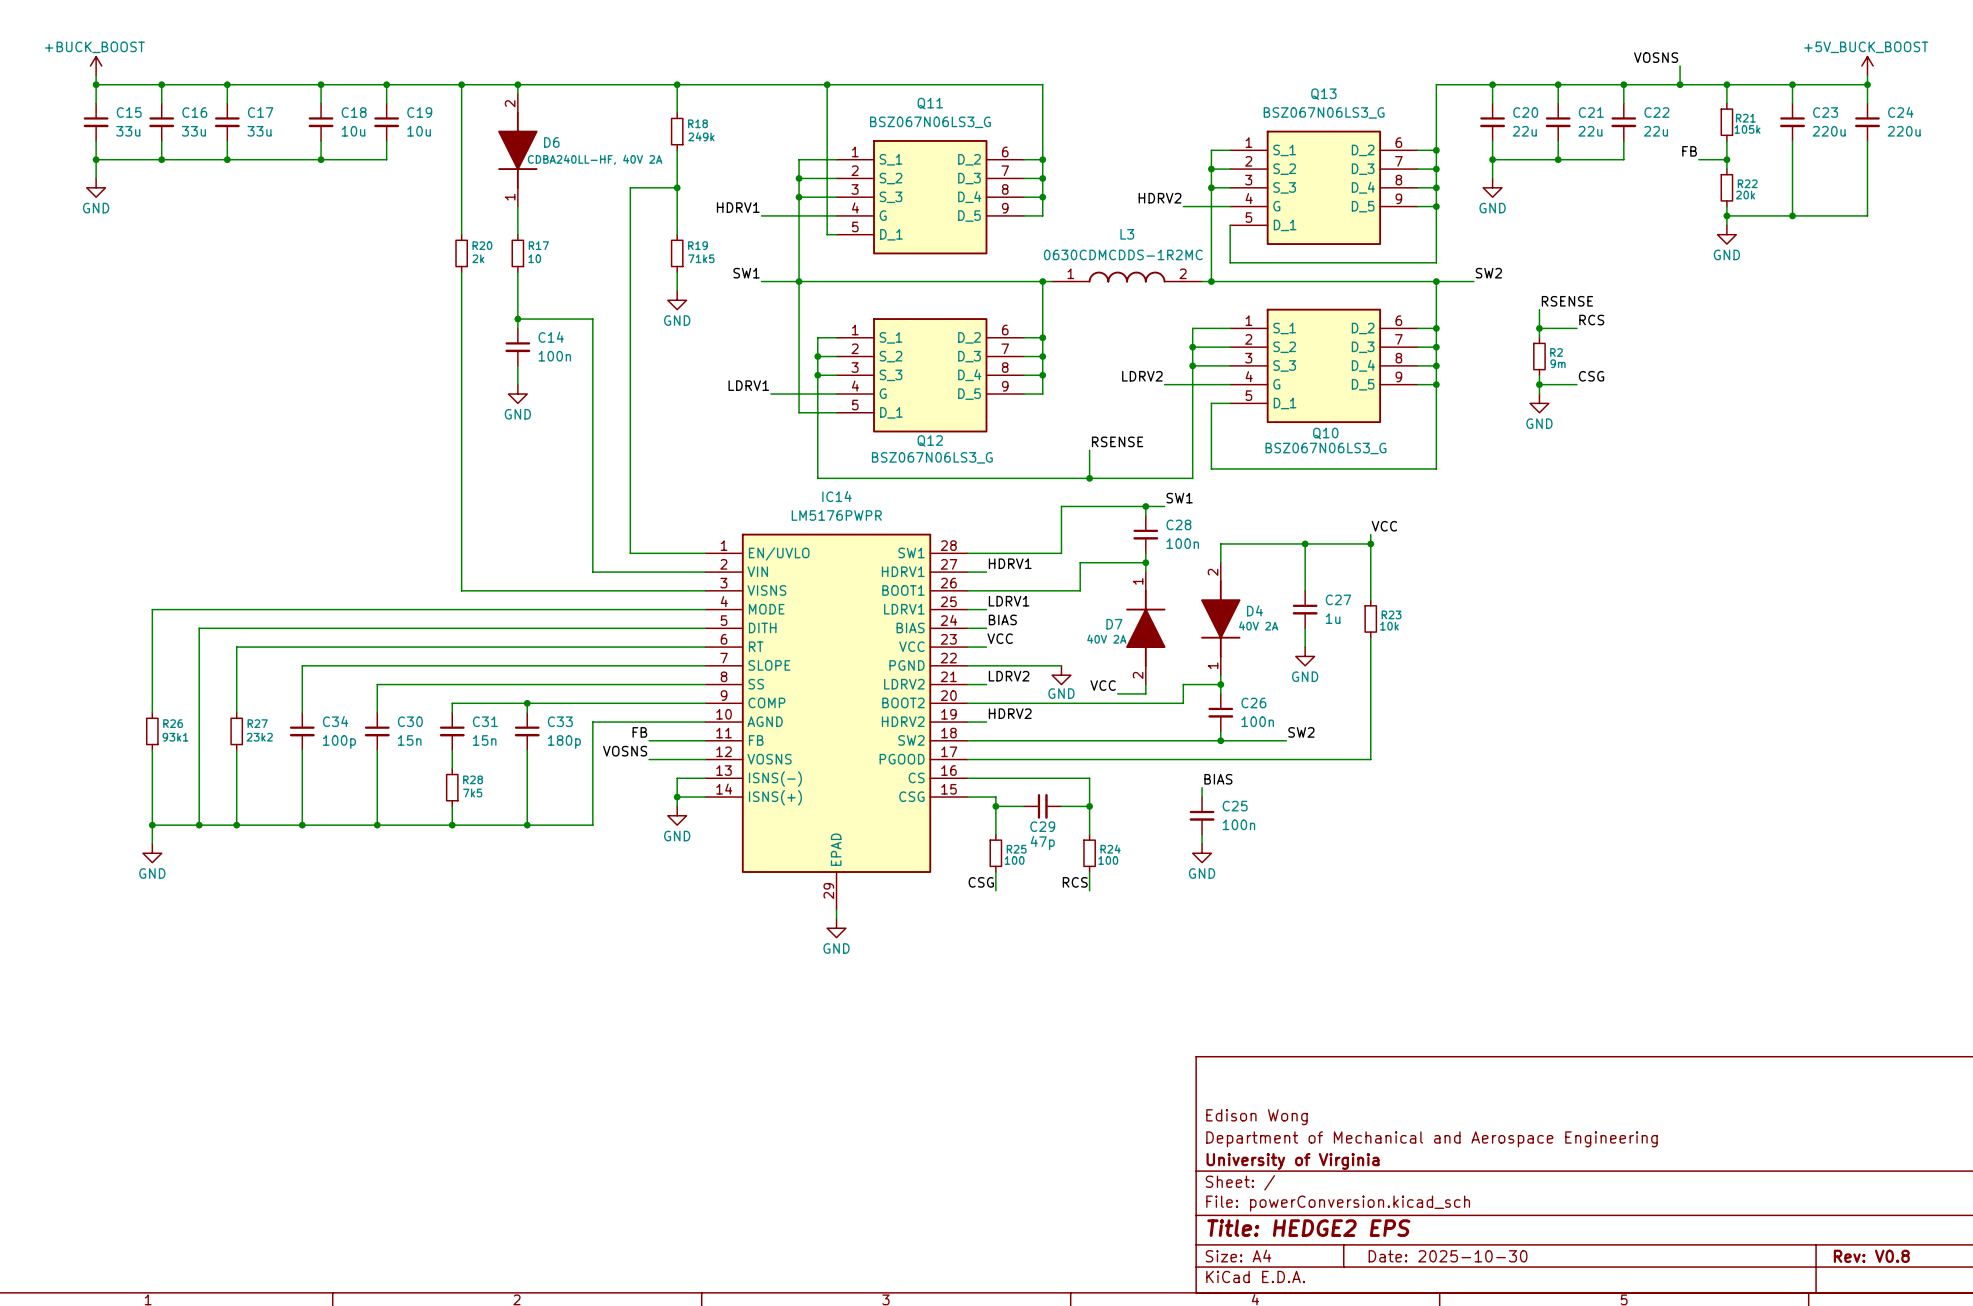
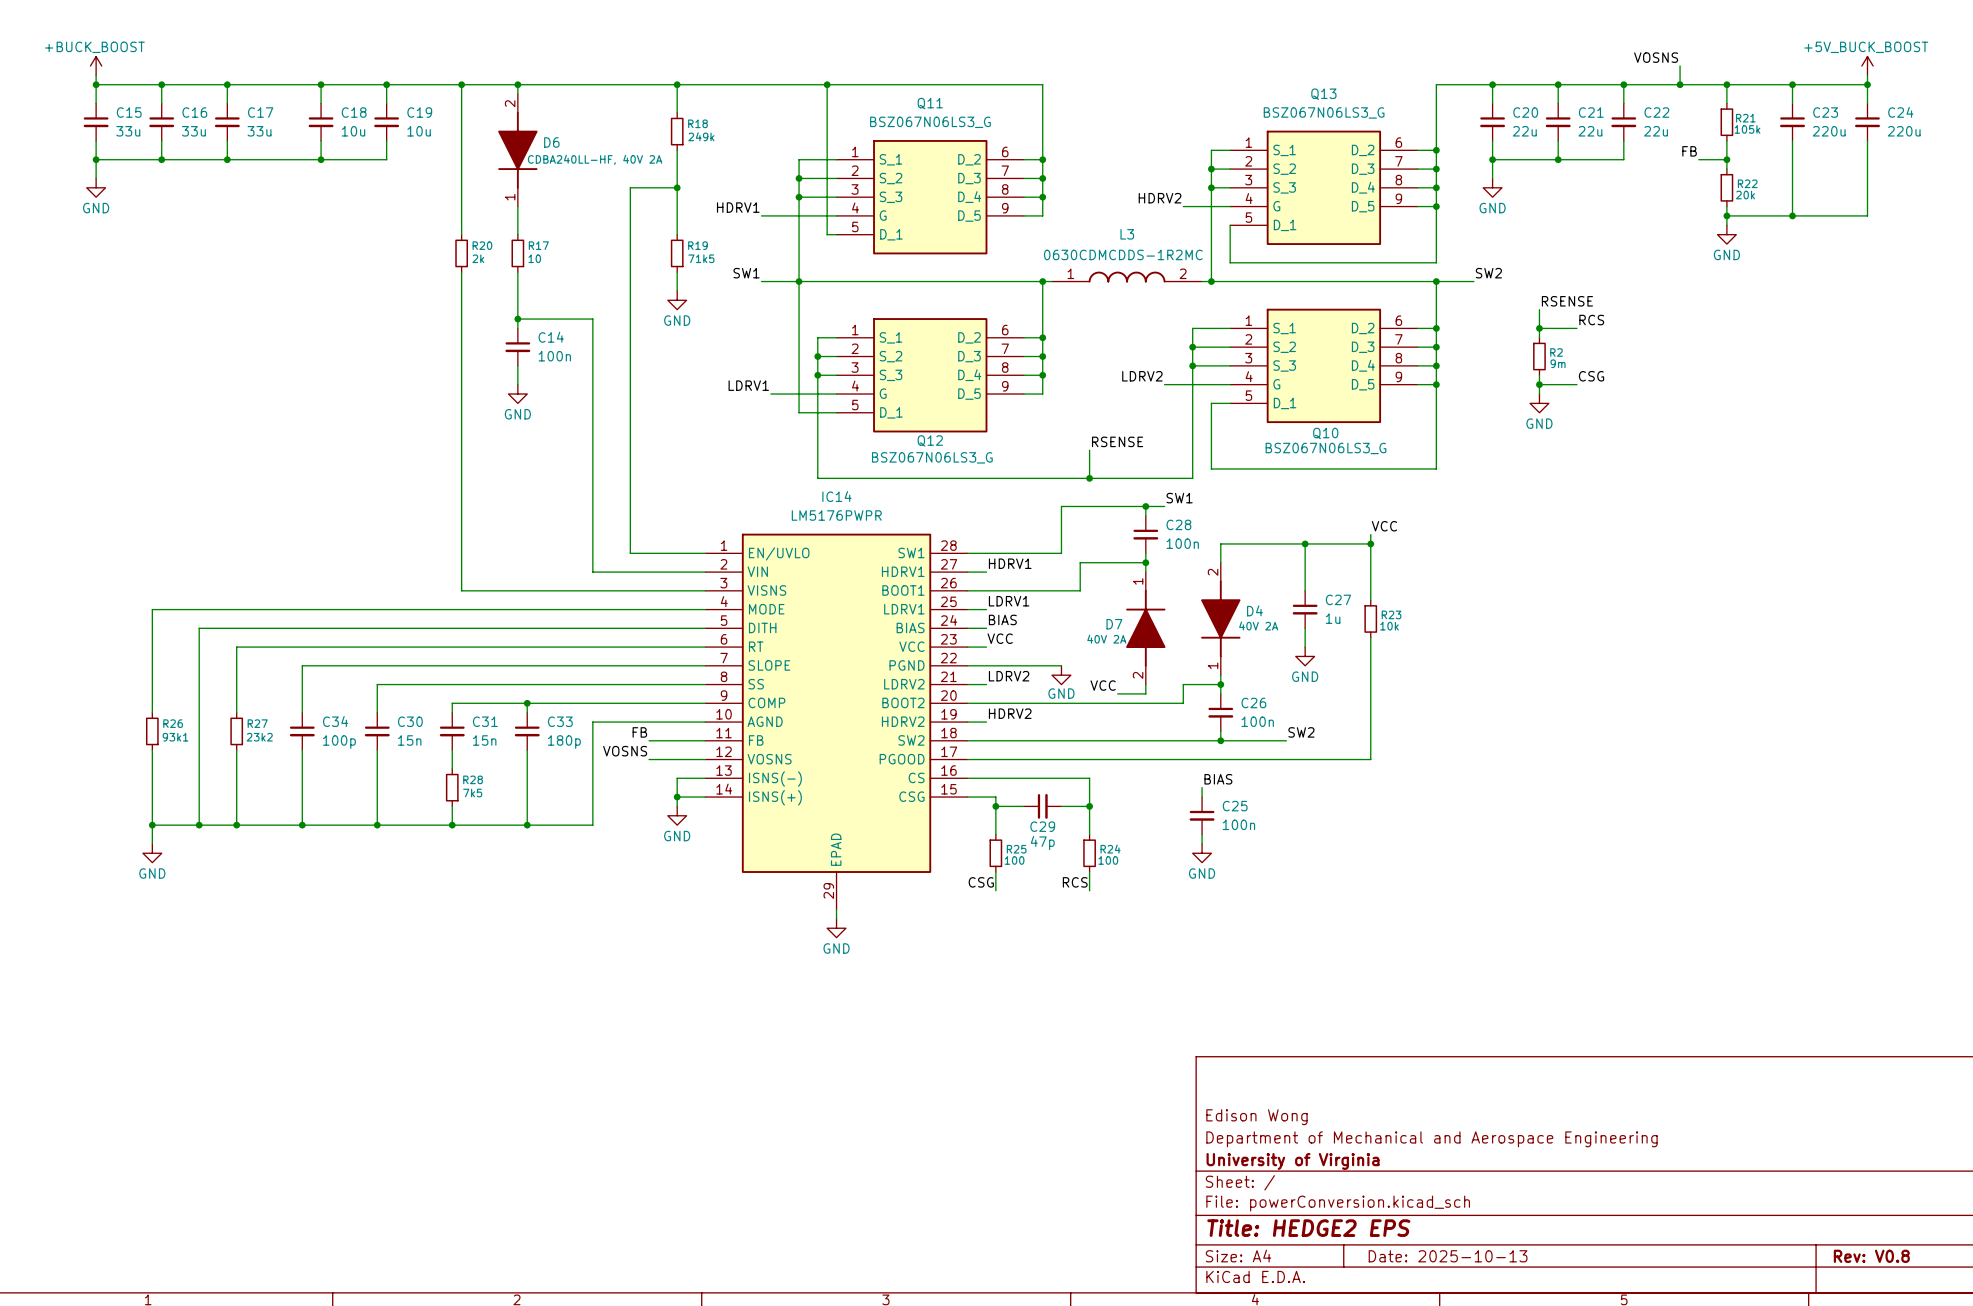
title block: Date: 2025-10-30 (1448, 1256) -> Date: 2025-10-13 (1448, 1256)

